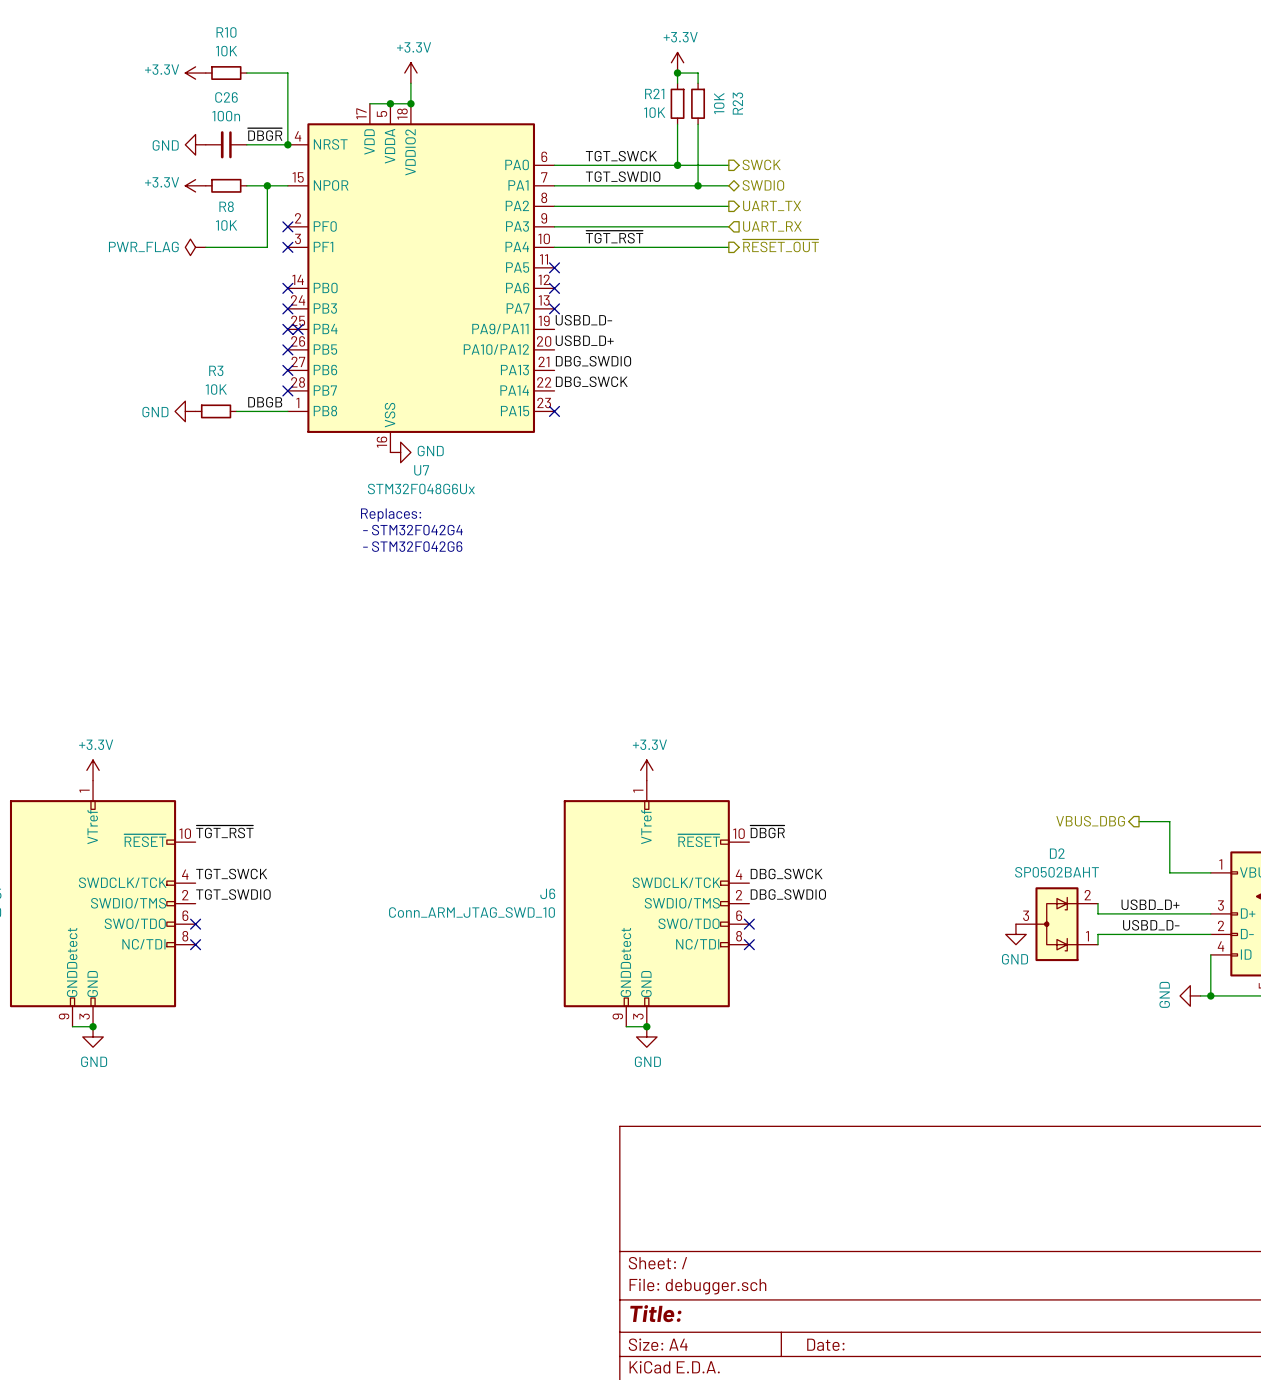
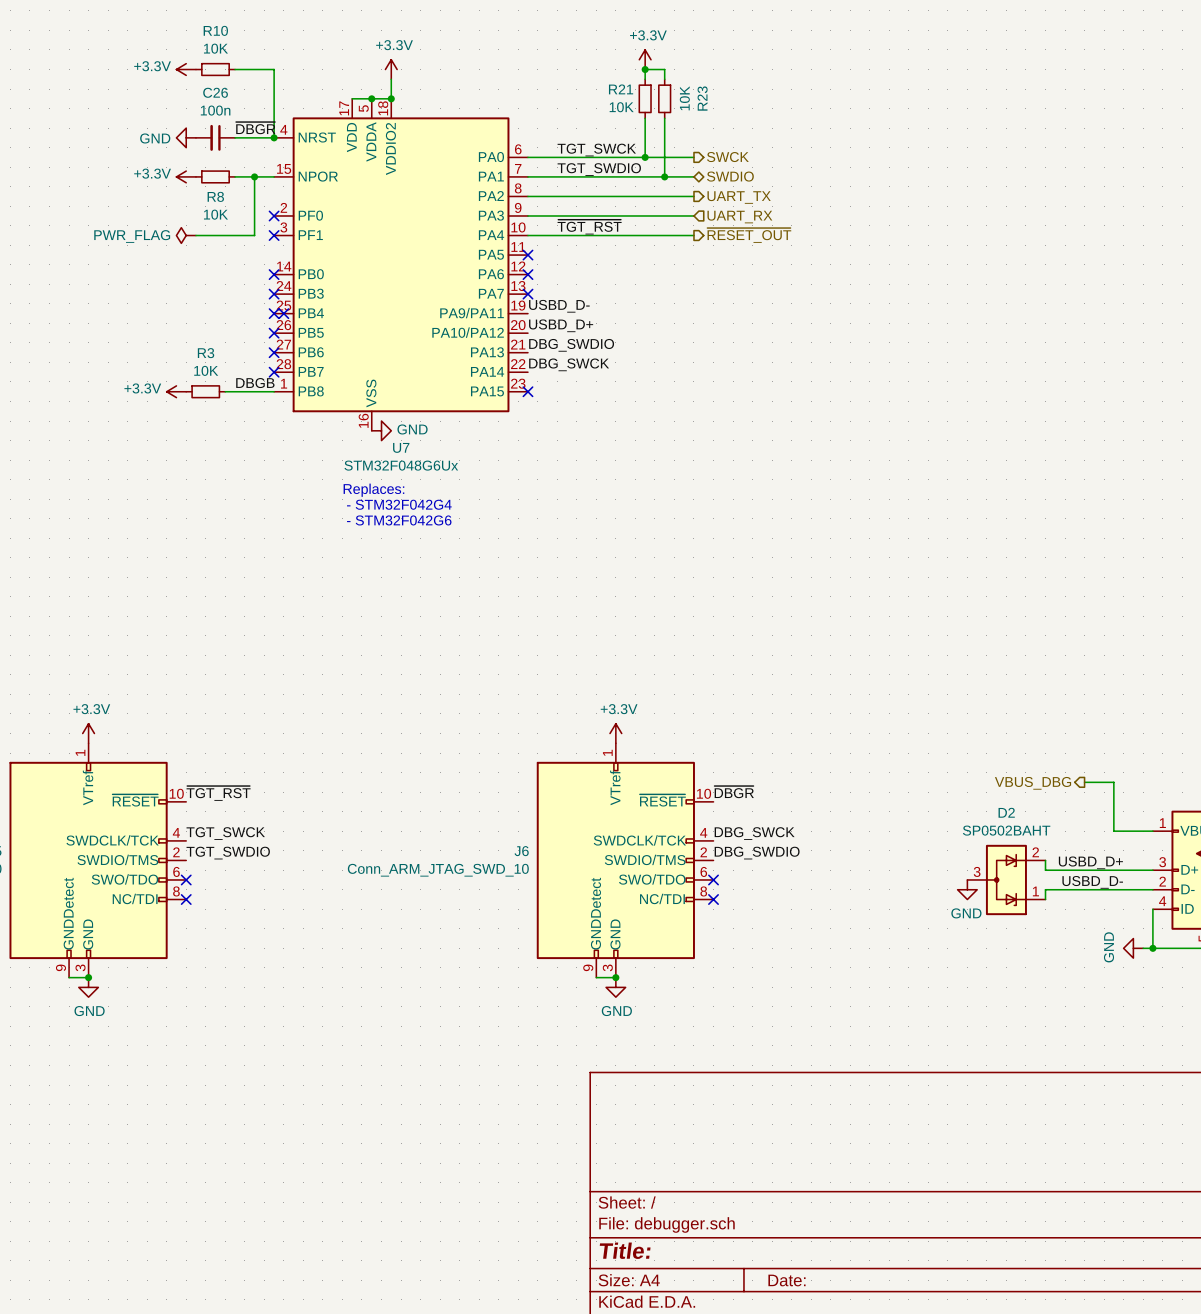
power symbol: GND (185, 411) -> +3.3V (176, 391)

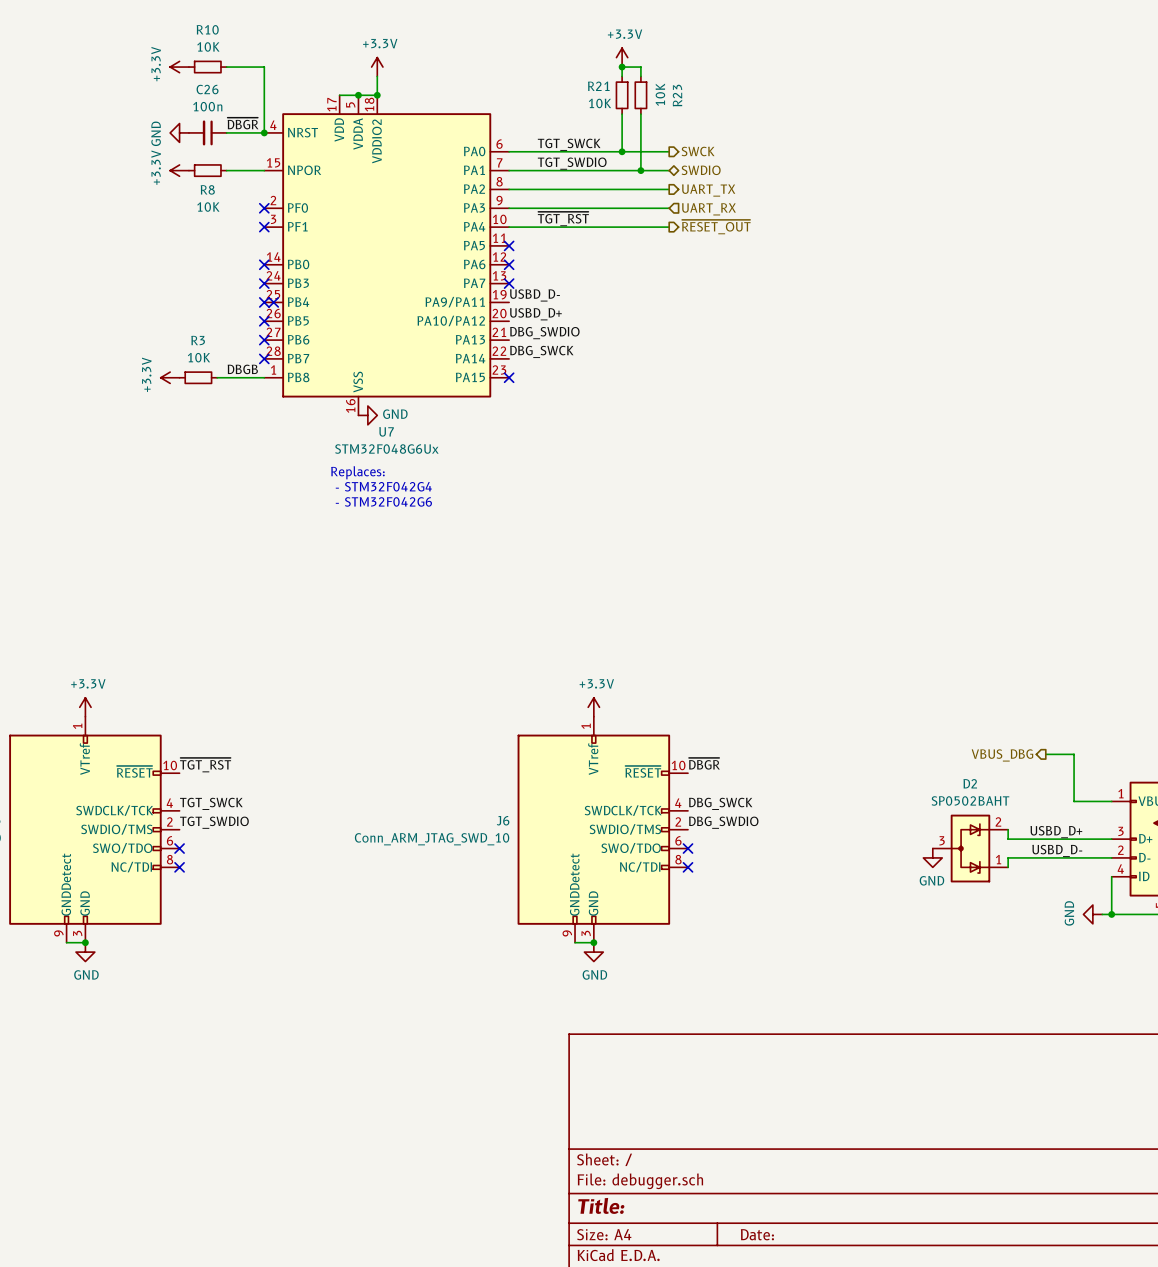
power symbol text rotation: 0° (152, 66) -> 90° counterclockwise (156, 64)
power symbol text rotation: 0° (155, 138) -> 90° counterclockwise (156, 133)
power symbol text rotation: 0° (152, 173) -> 90° counterclockwise (156, 167)
wire: (254, 176) (254, 235) (195, 235) -> none
junction: (254, 176) -> none
power symbol: PWR_FLAG (186, 235) -> none
power symbol text rotation: 0° (142, 388) -> 90° counterclockwise (146, 374)

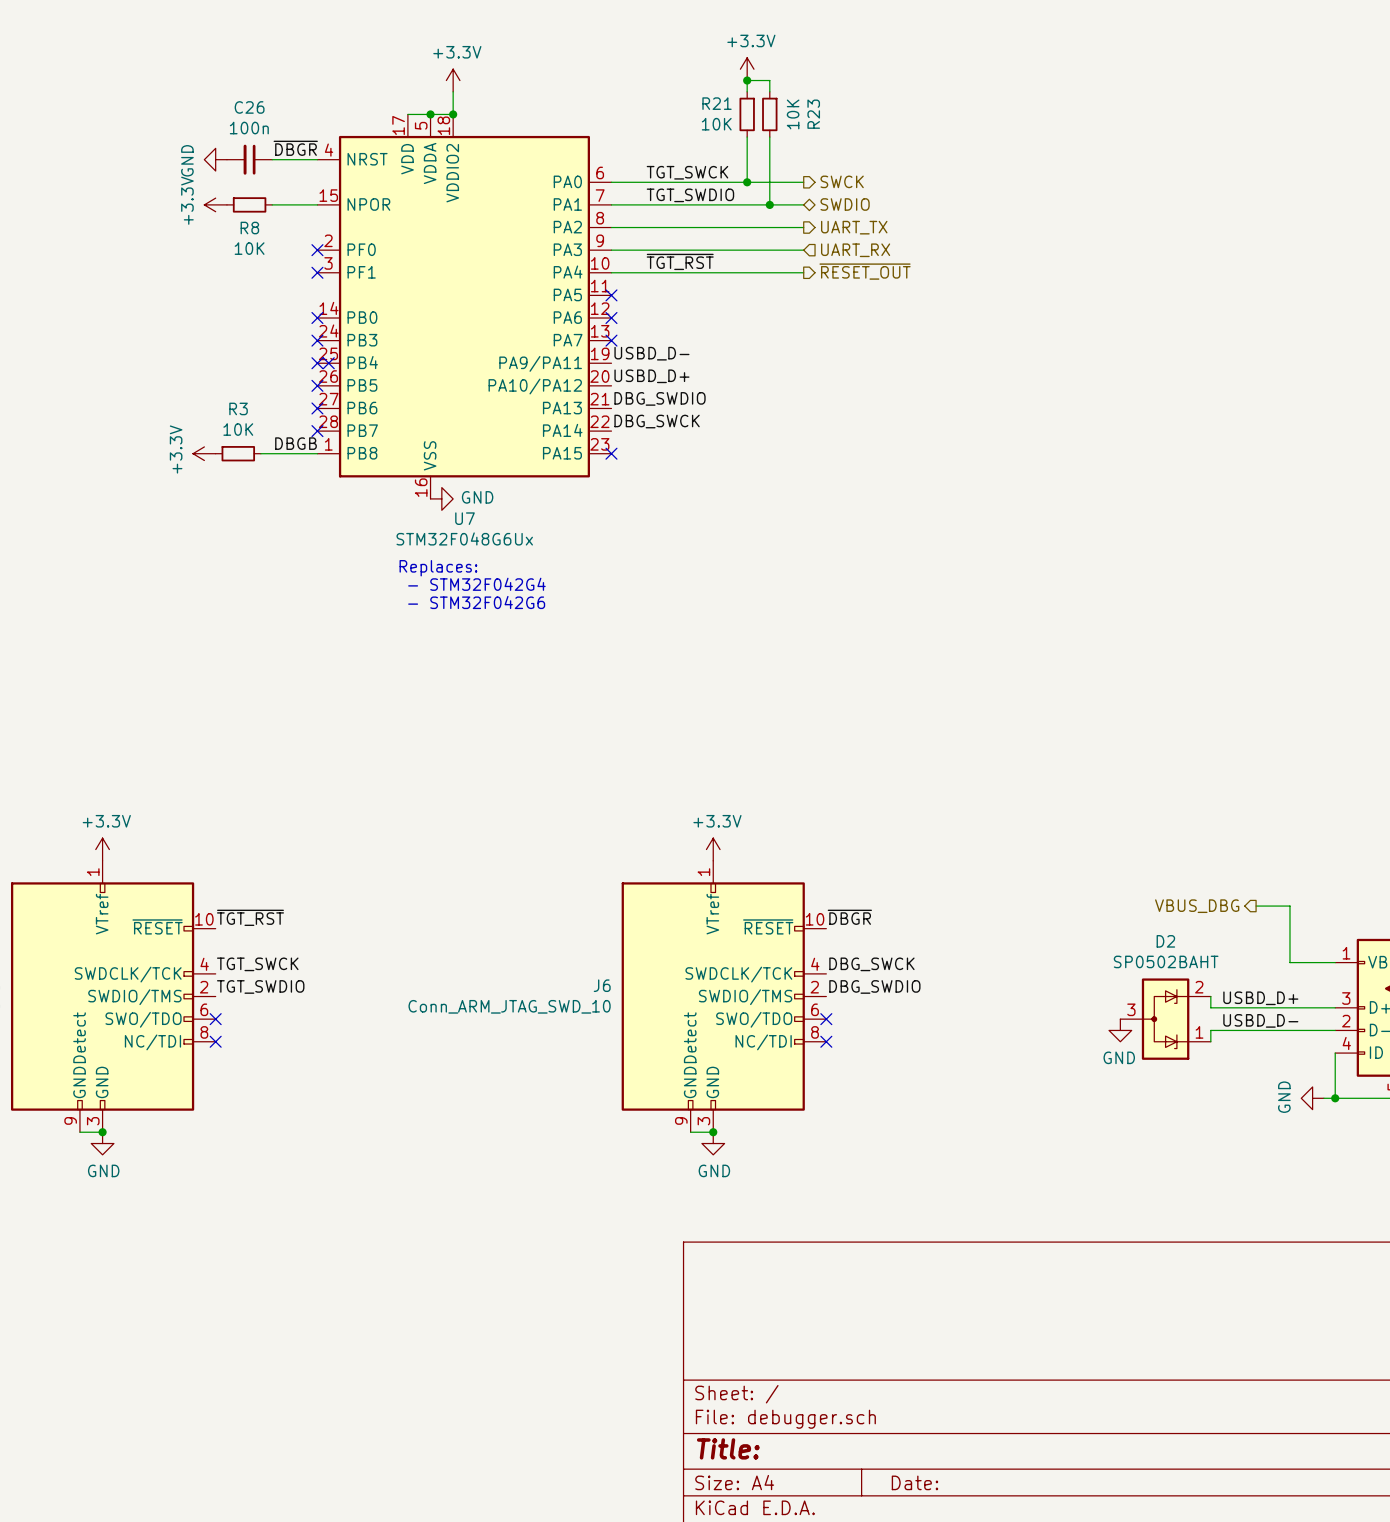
power symbol: +3.3V (179, 67) -> none
R10: 10K (207, 67) -> none
wire: (226, 67) (264, 67) (264, 132) -> none
junction: (264, 132) -> none

